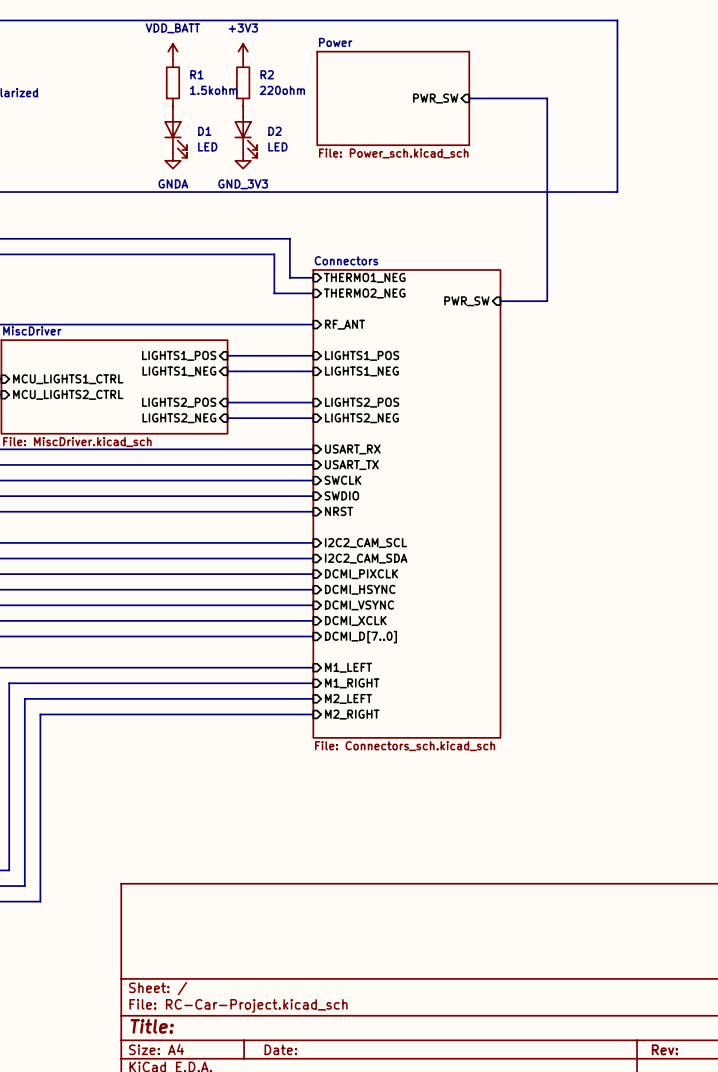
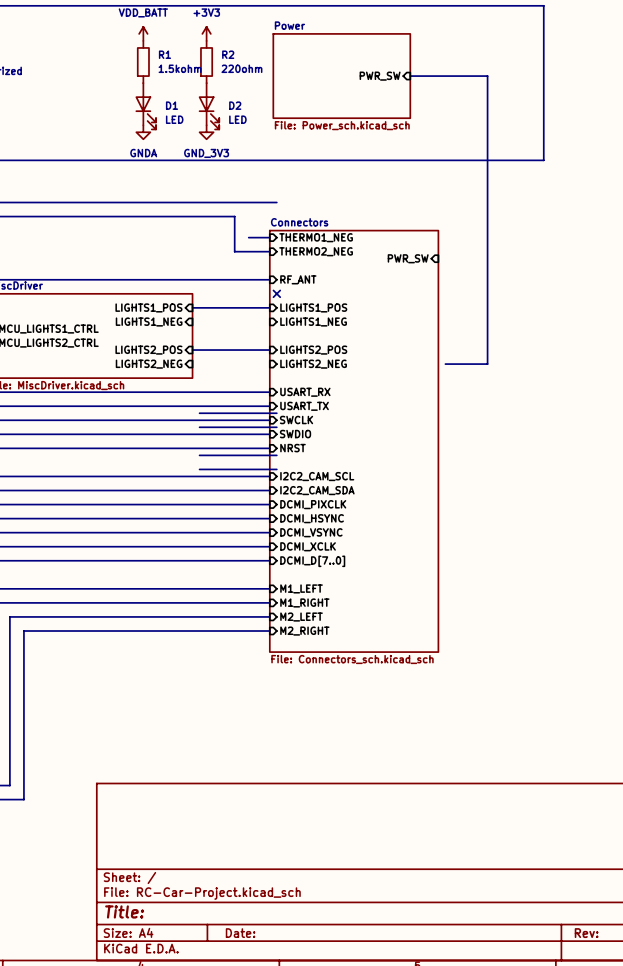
wire: (547, 98) (547, 301) (500, 301) -> (480, 76) (487, 76) (487, 364) (445, 364)
wire: (289, 238) (289, 277) -> (248, 202) (276, 202)
no-connect mark: none -> (276, 293)
wire: (227, 371) (313, 371) -> (199, 413) (276, 413)
wire: (227, 418) (313, 418) -> (199, 427) (276, 427)
wire: none -> (199, 455) (276, 455)
wire: none -> (199, 469) (276, 469)

